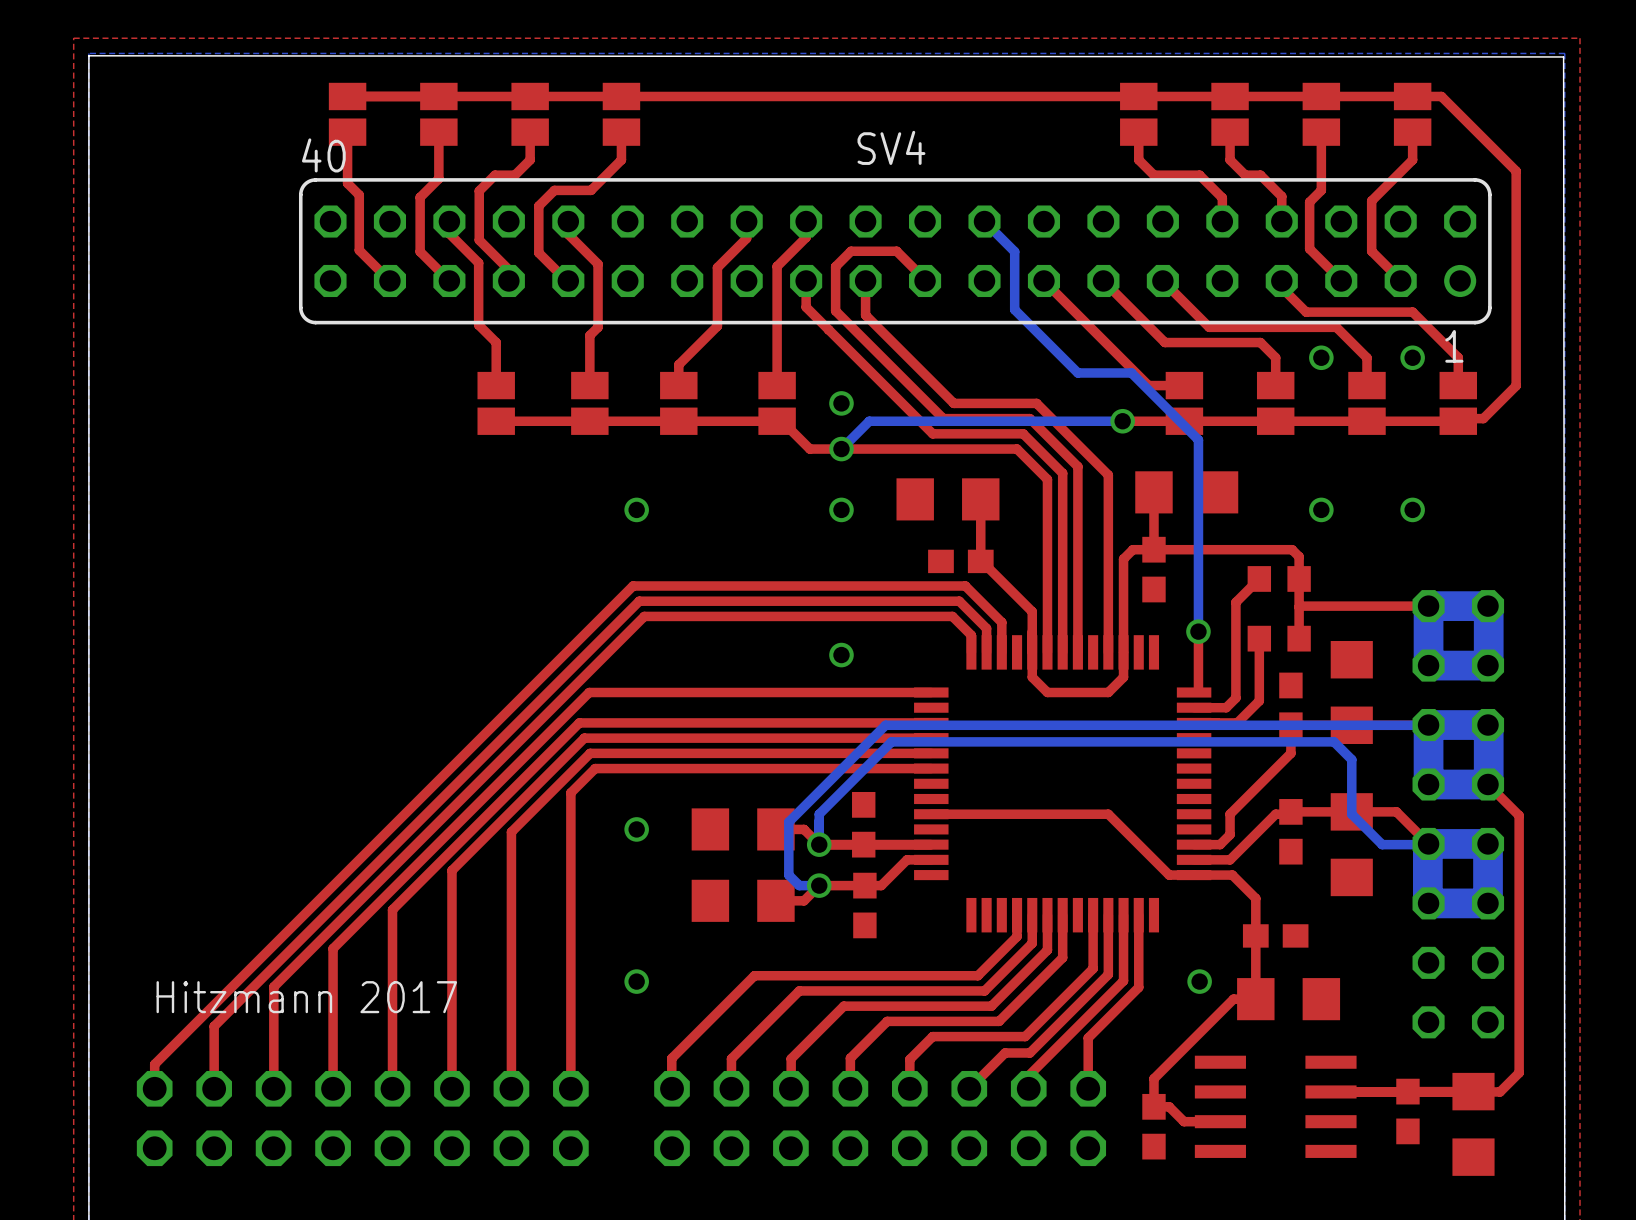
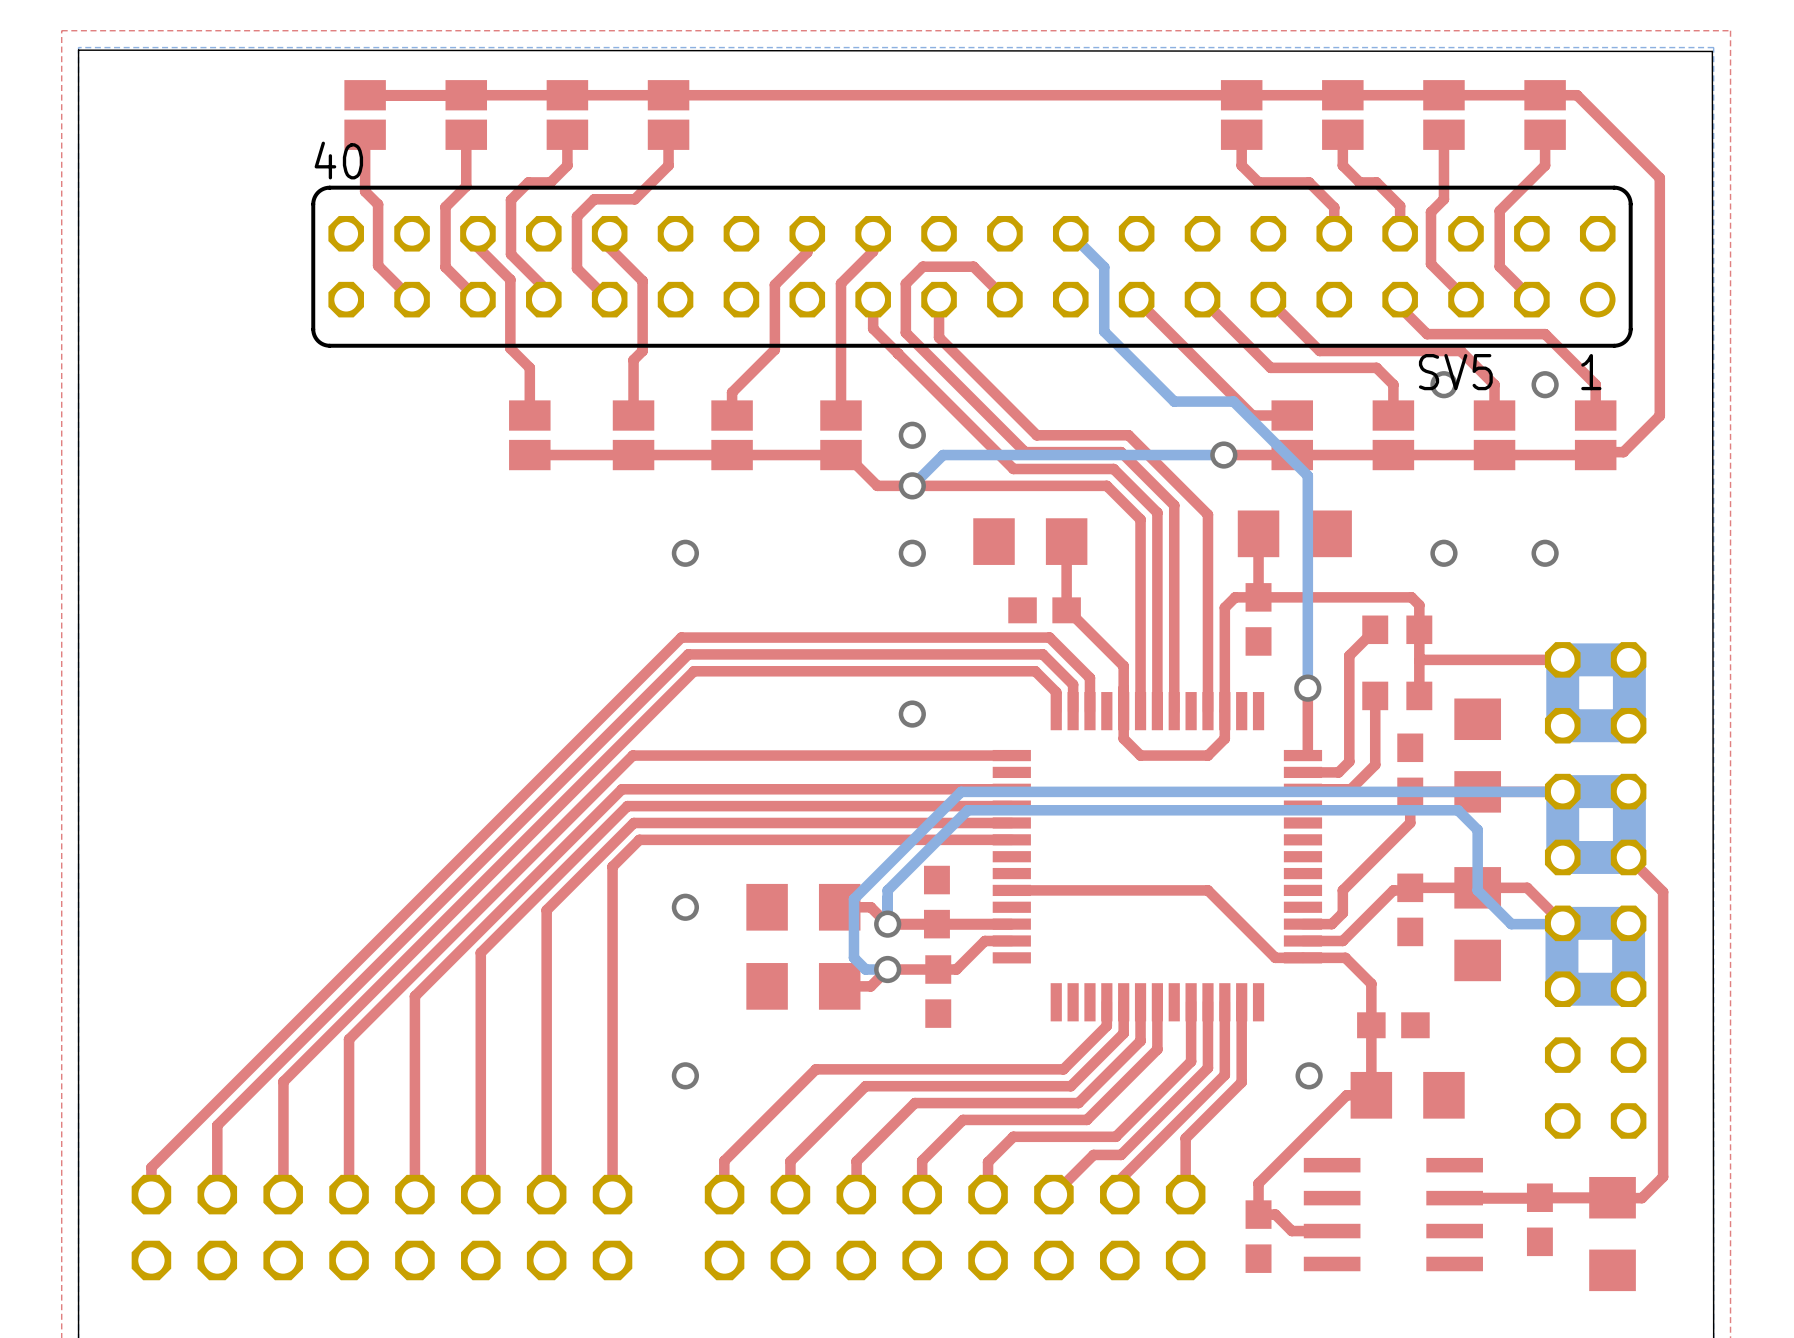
SV4 name: SV4 (891, 147) -> SV5 (1455, 372)
text: Hitzmann 2017 (306, 997) -> none

